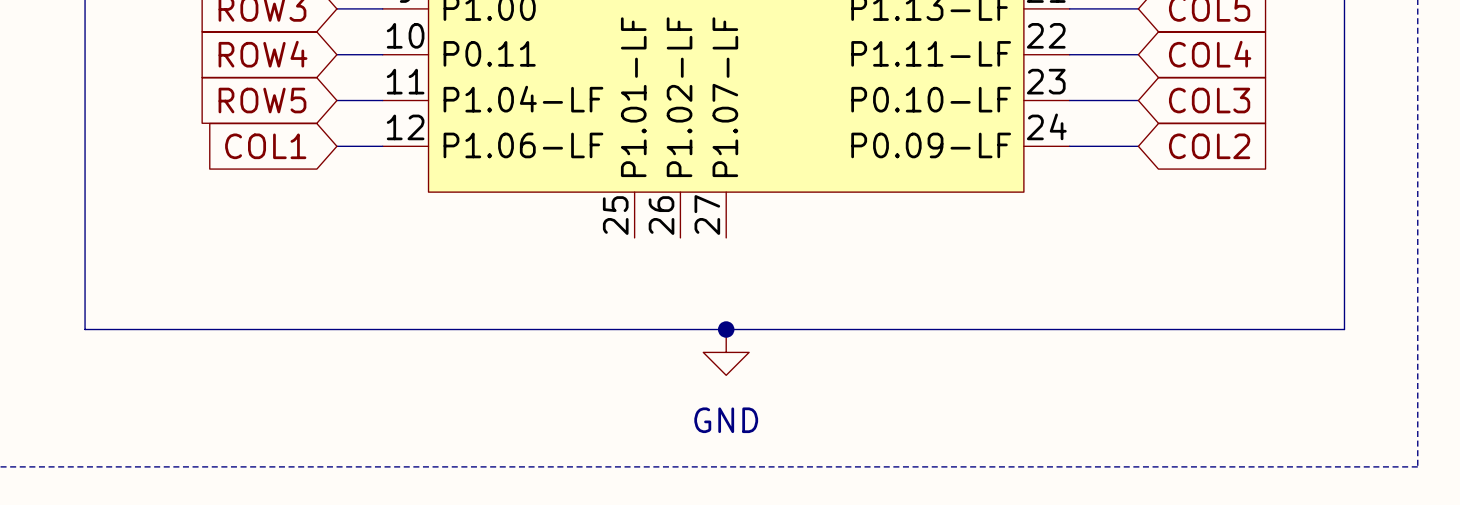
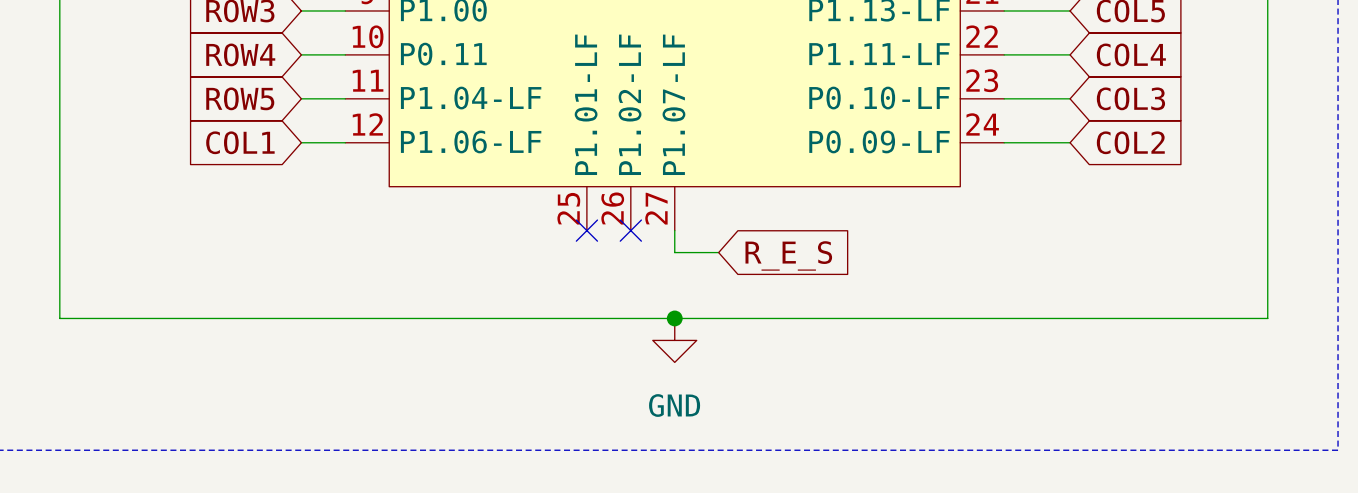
no-connect mark: none -> (586, 230)
no-connect mark: none -> (630, 230)
wire: none -> (674, 230) (674, 252) (718, 252)
global label: none -> R_E_S (788, 255)

